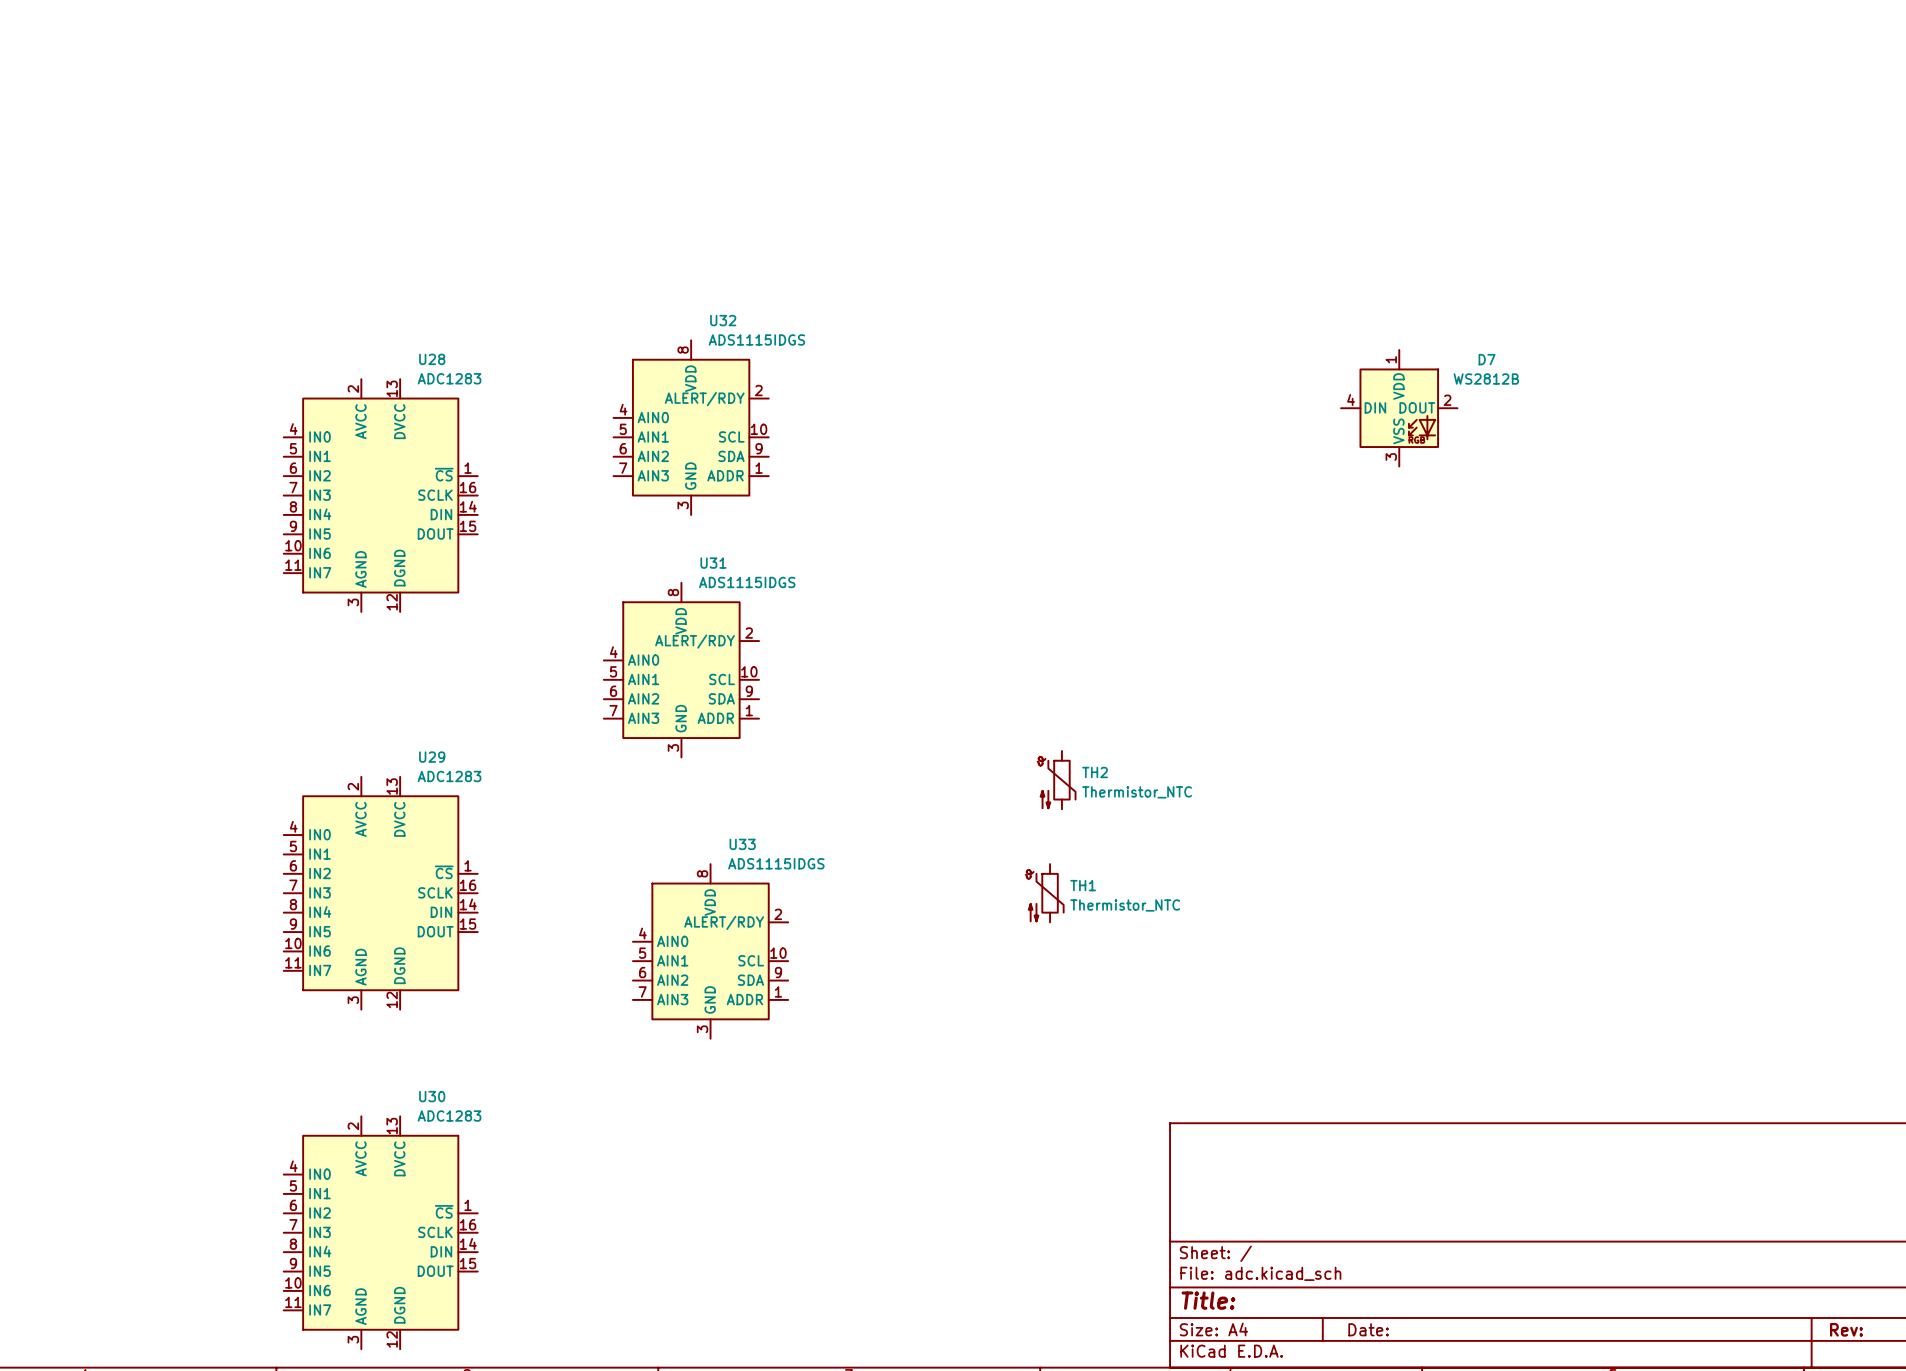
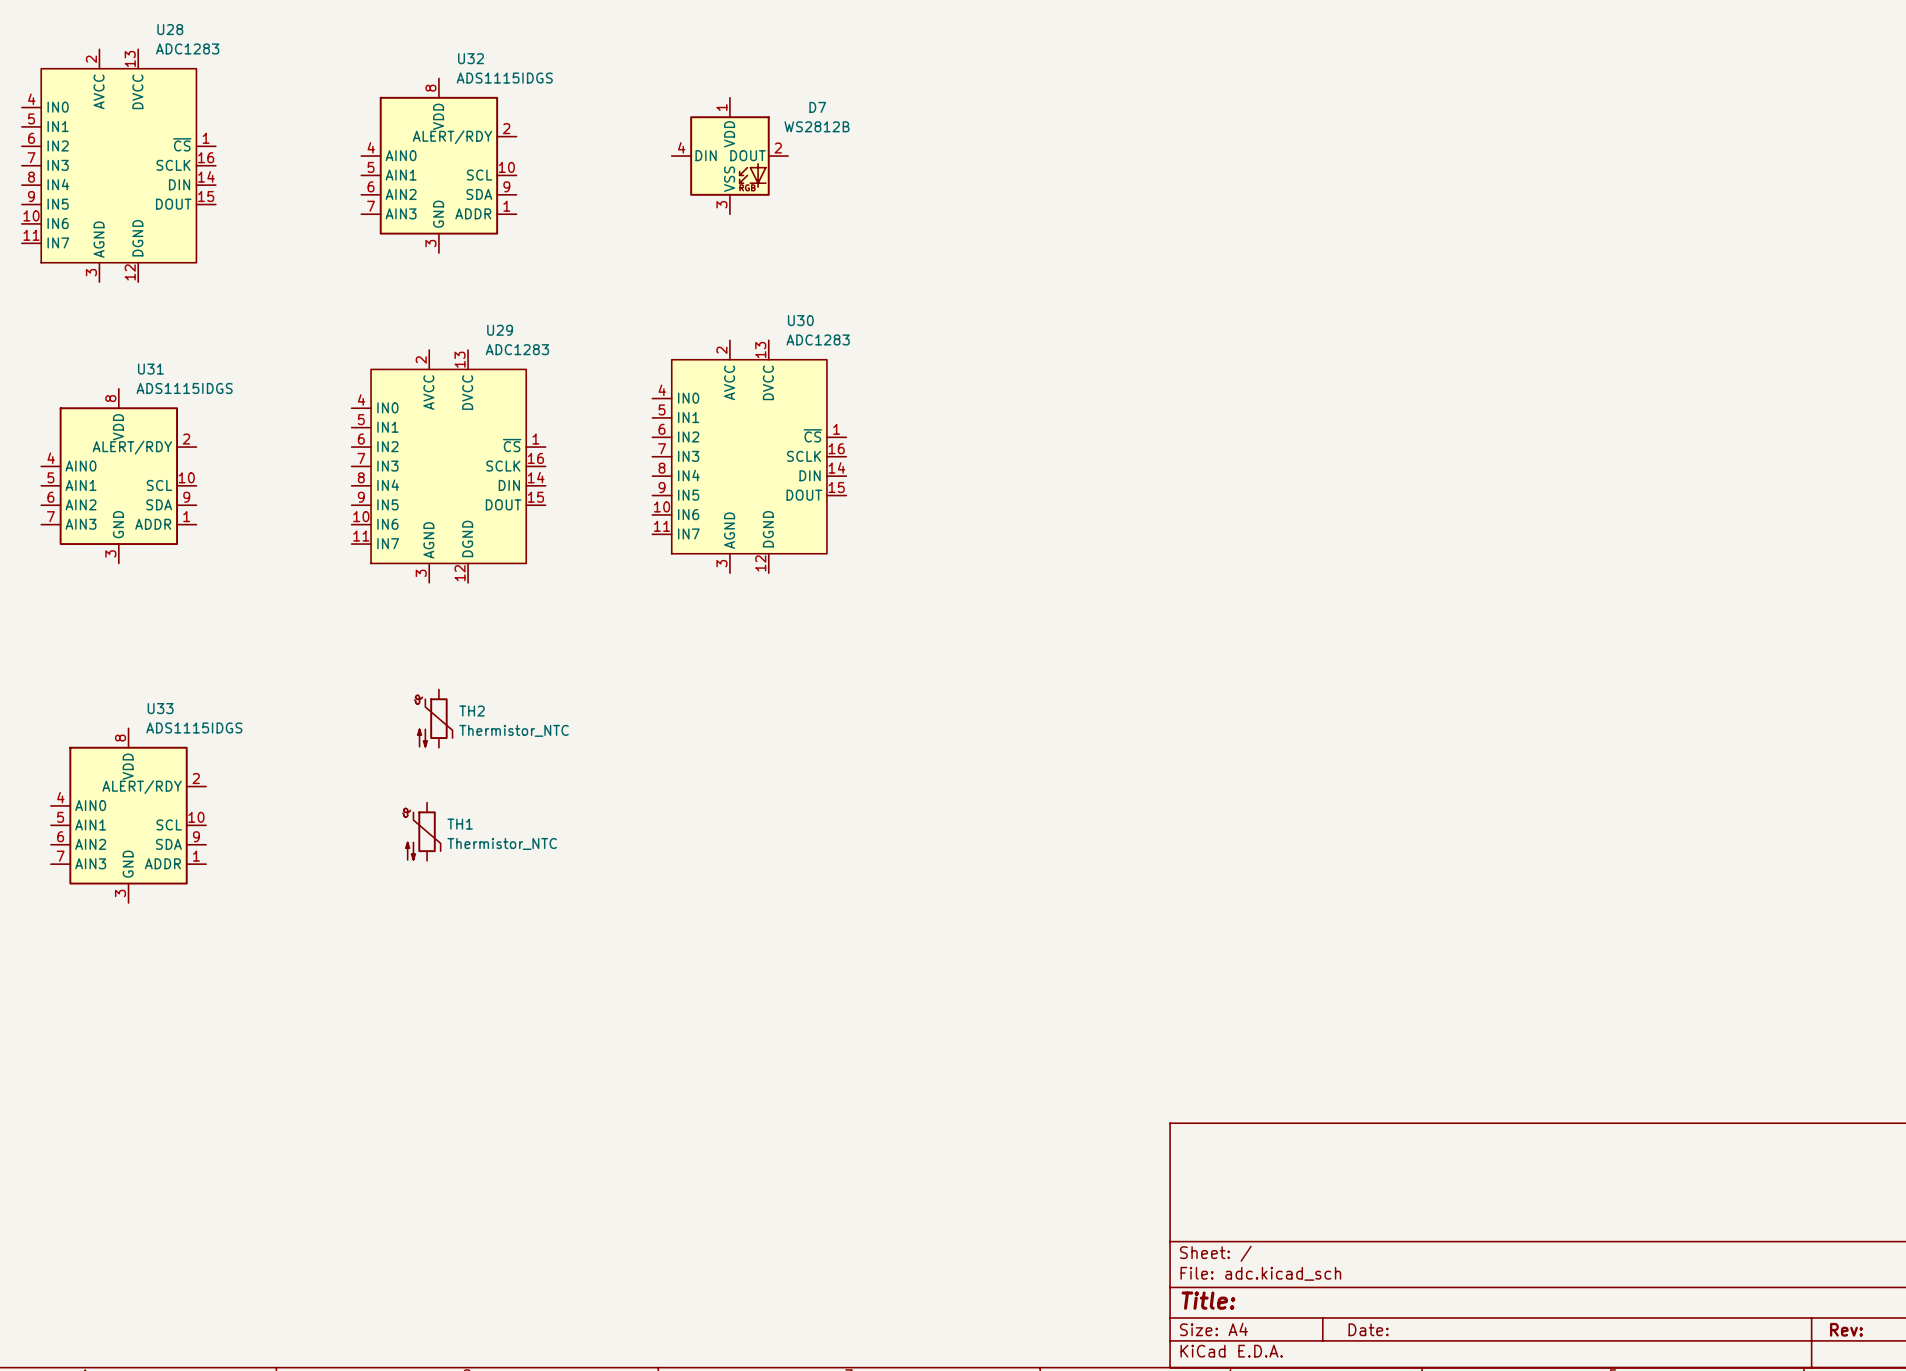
D7 position: (1399, 408) -> (729, 156)
U32 position: (691, 427) -> (438, 165)
U28 position: (380, 495) -> (118, 165)
U31 position: (681, 670) -> (118, 476)
TH2 position: (1056, 780) -> (433, 718)
U29 position: (380, 893) -> (448, 466)
TH1 position: (1044, 893) -> (421, 831)
U33 position: (710, 951) -> (128, 815)
U30 position: (380, 1232) -> (749, 456)

